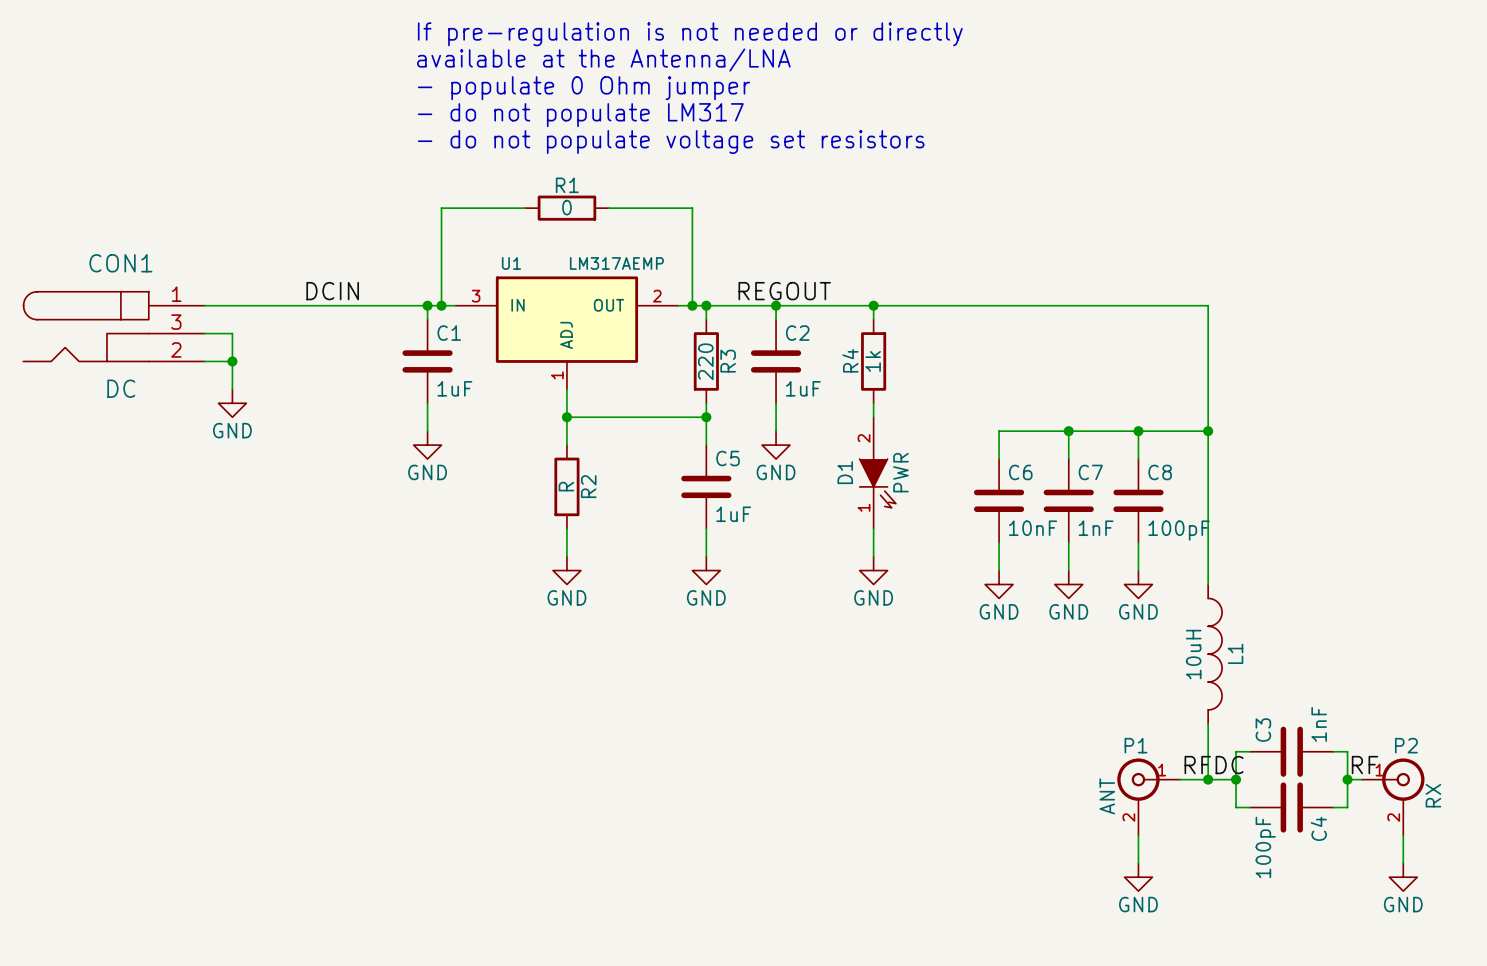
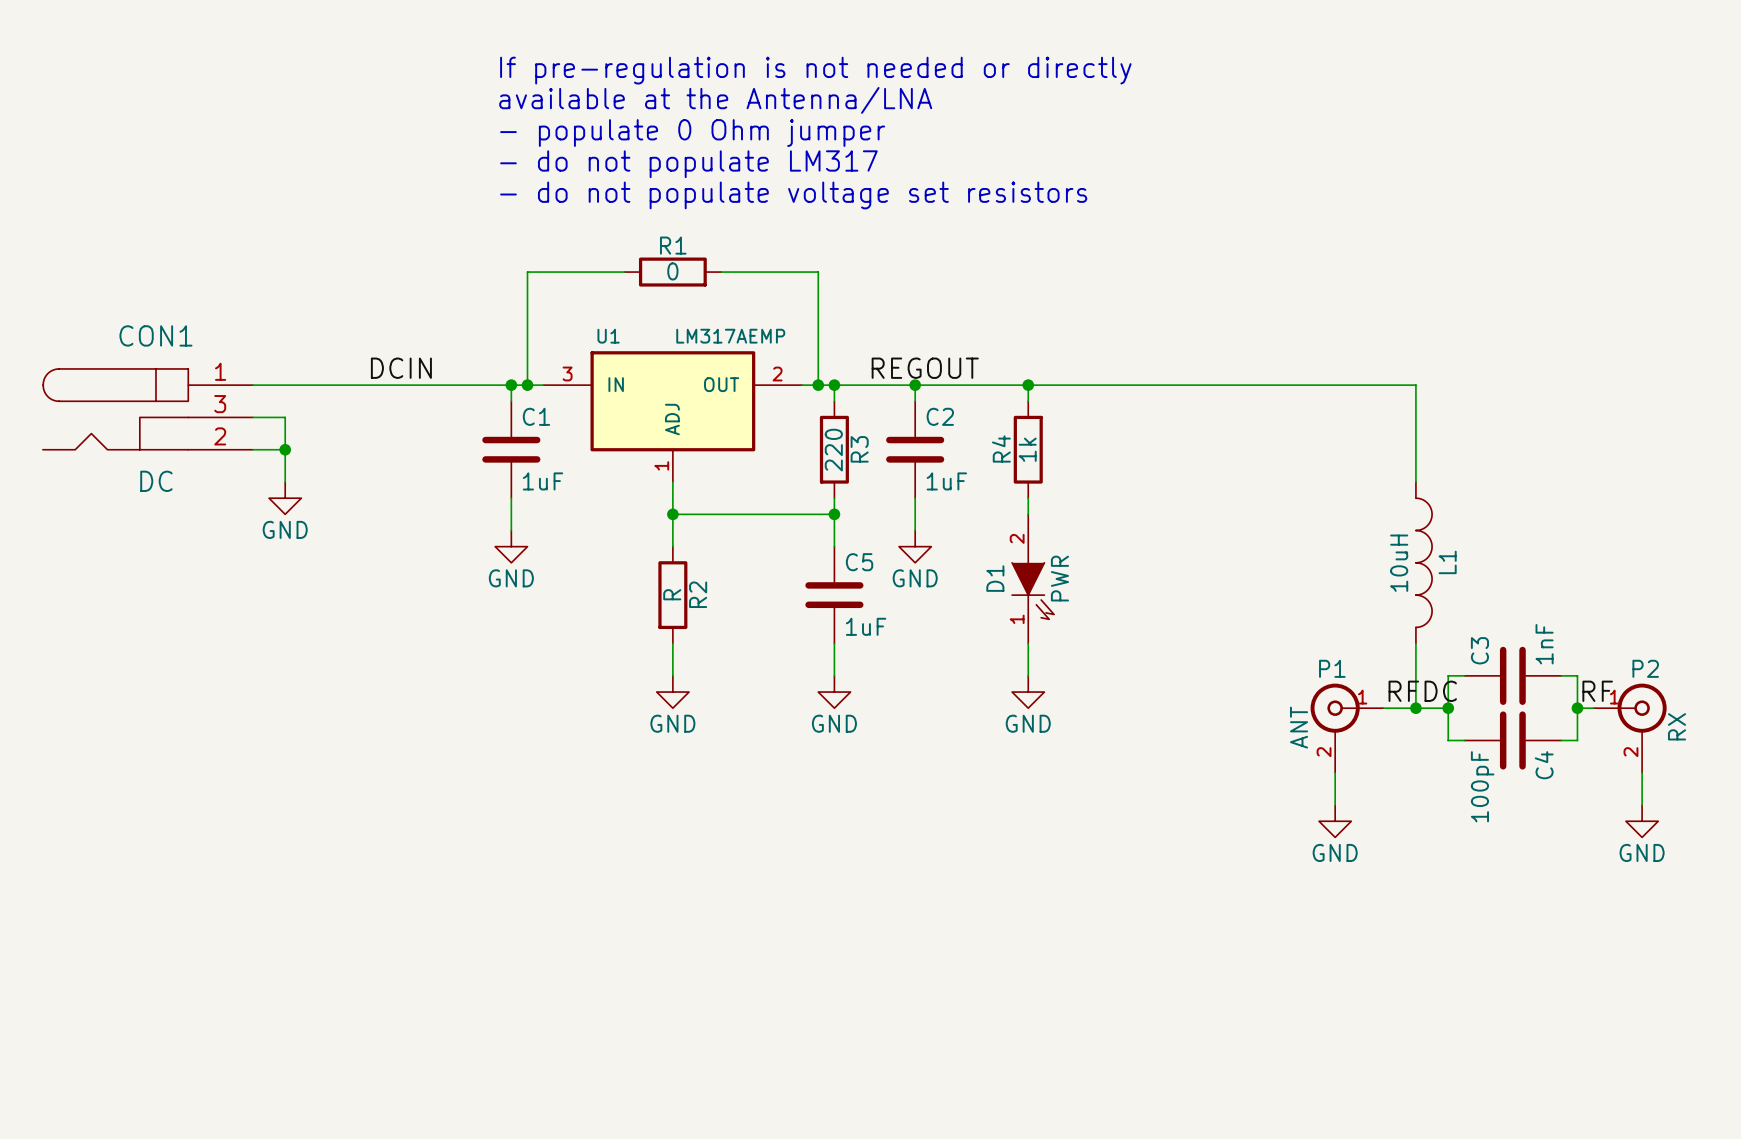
wire: (1208, 389) (1208, 528) -> none
wire: (1068, 431) (1068, 459) -> none
junction: (1068, 431) -> none
wire: (1138, 431) (1138, 459) -> none
junction: (1138, 431) -> none
wire: (1208, 431) (999, 431) (999, 459) -> none
junction: (1208, 431) -> none
C6: 10nF (999, 500) -> none
C7: 1nF (1068, 500) -> none
C8: 100pF (1138, 500) -> none
wire: (999, 542) (999, 570) -> none
wire: (1068, 542) (1068, 570) -> none
wire: (1138, 542) (1138, 570) -> none
power symbol: GND (999, 584) -> none
power symbol: GND (1068, 584) -> none
power symbol: GND (1138, 584) -> none
junction: none -> (1415, 708)
junction: none -> (1448, 708)
junction: none -> (1577, 708)
L1 position: (1215, 654) -> (1424, 562)
power symbol: none -> GND (1335, 821)
power symbol: none -> GND (1642, 821)
wire: (1208, 723) (1208, 779) -> none
wire: (1249, 751) (1236, 751) (1236, 807) (1249, 807) -> (1464, 675) (1448, 675) (1448, 740) (1464, 740)
C3 position: (1291, 751) -> (1512, 675)
wire: (1333, 751) (1347, 751) (1347, 807) (1333, 807) -> (1561, 675) (1577, 675) (1577, 740) (1561, 740)
label position: RFDC (1214, 765) -> RFDC (1422, 691)
label position: RF (1364, 765) -> RF (1597, 691)
wire: (1180, 779) (1236, 779) -> (1383, 708) (1448, 708)
junction: (1208, 779) -> none
junction: (1236, 779) -> none
wire: (1347, 779) (1361, 779) -> (1577, 708) (1593, 708)
junction: (1347, 779) -> none
P1 position: (1148, 796) -> (1347, 728)
P2 position: (1392, 796) -> (1630, 728)
C4 position: (1291, 807) -> (1512, 740)
wire: (1138, 835) (1138, 863) -> (1335, 772) (1335, 805)
wire: (1403, 835) (1403, 863) -> (1642, 772) (1642, 805)
power symbol: GND (1138, 877) -> none
power symbol: GND (1403, 877) -> none

